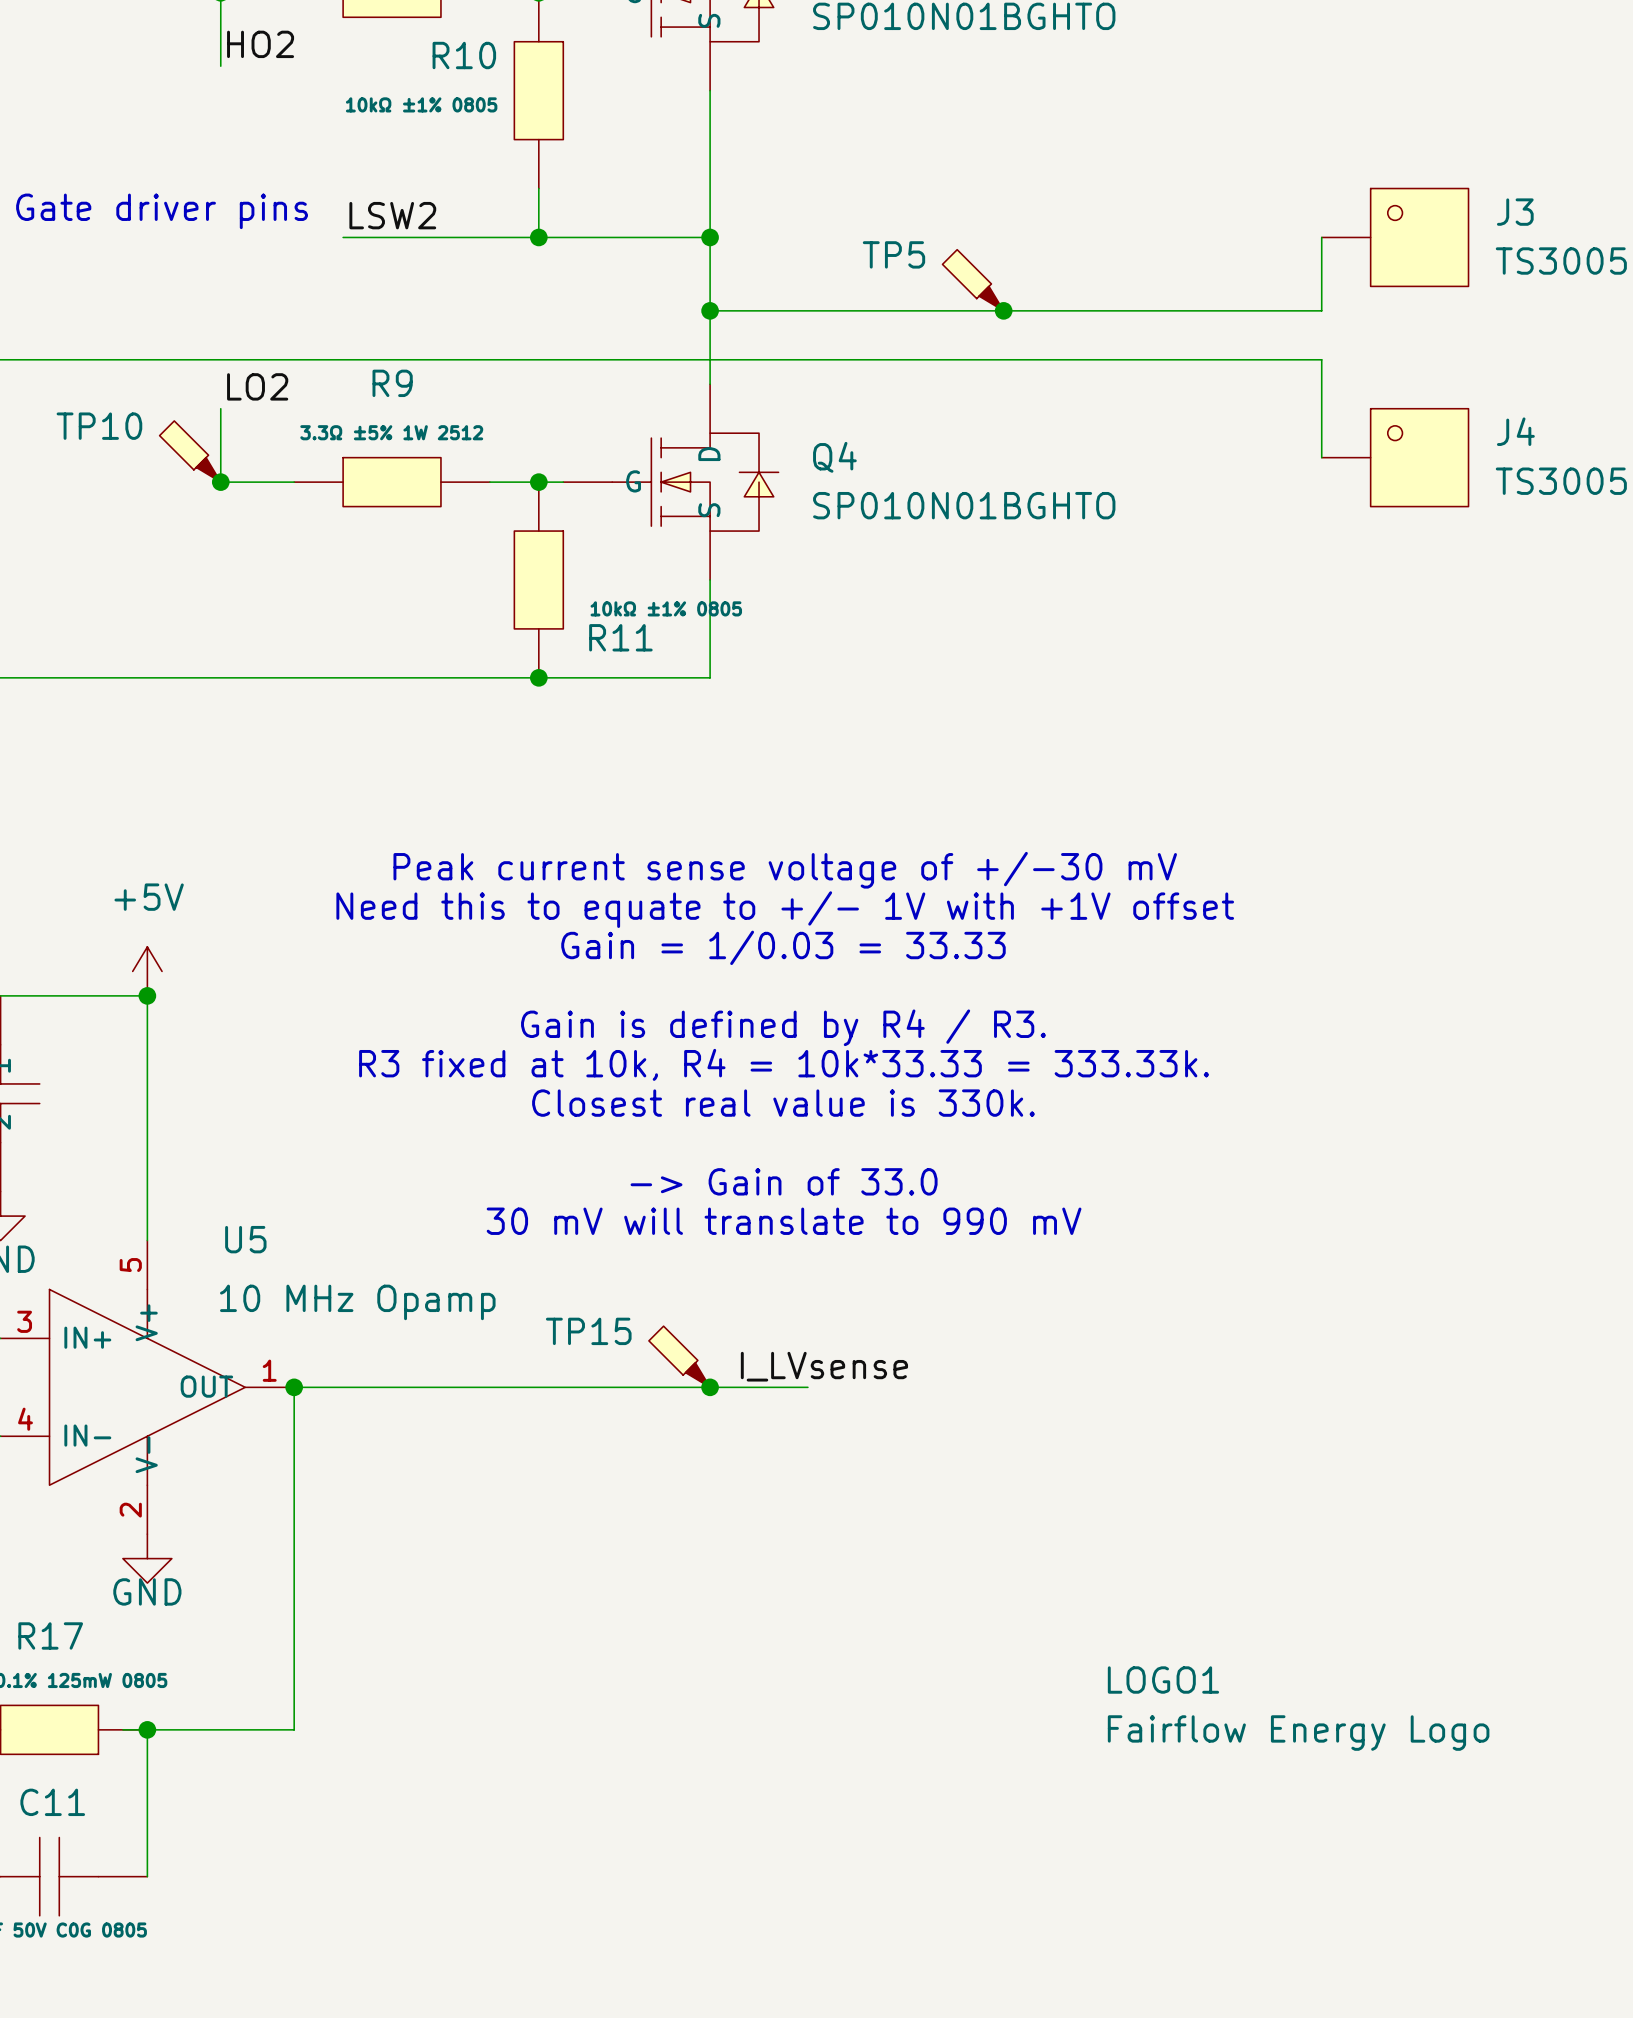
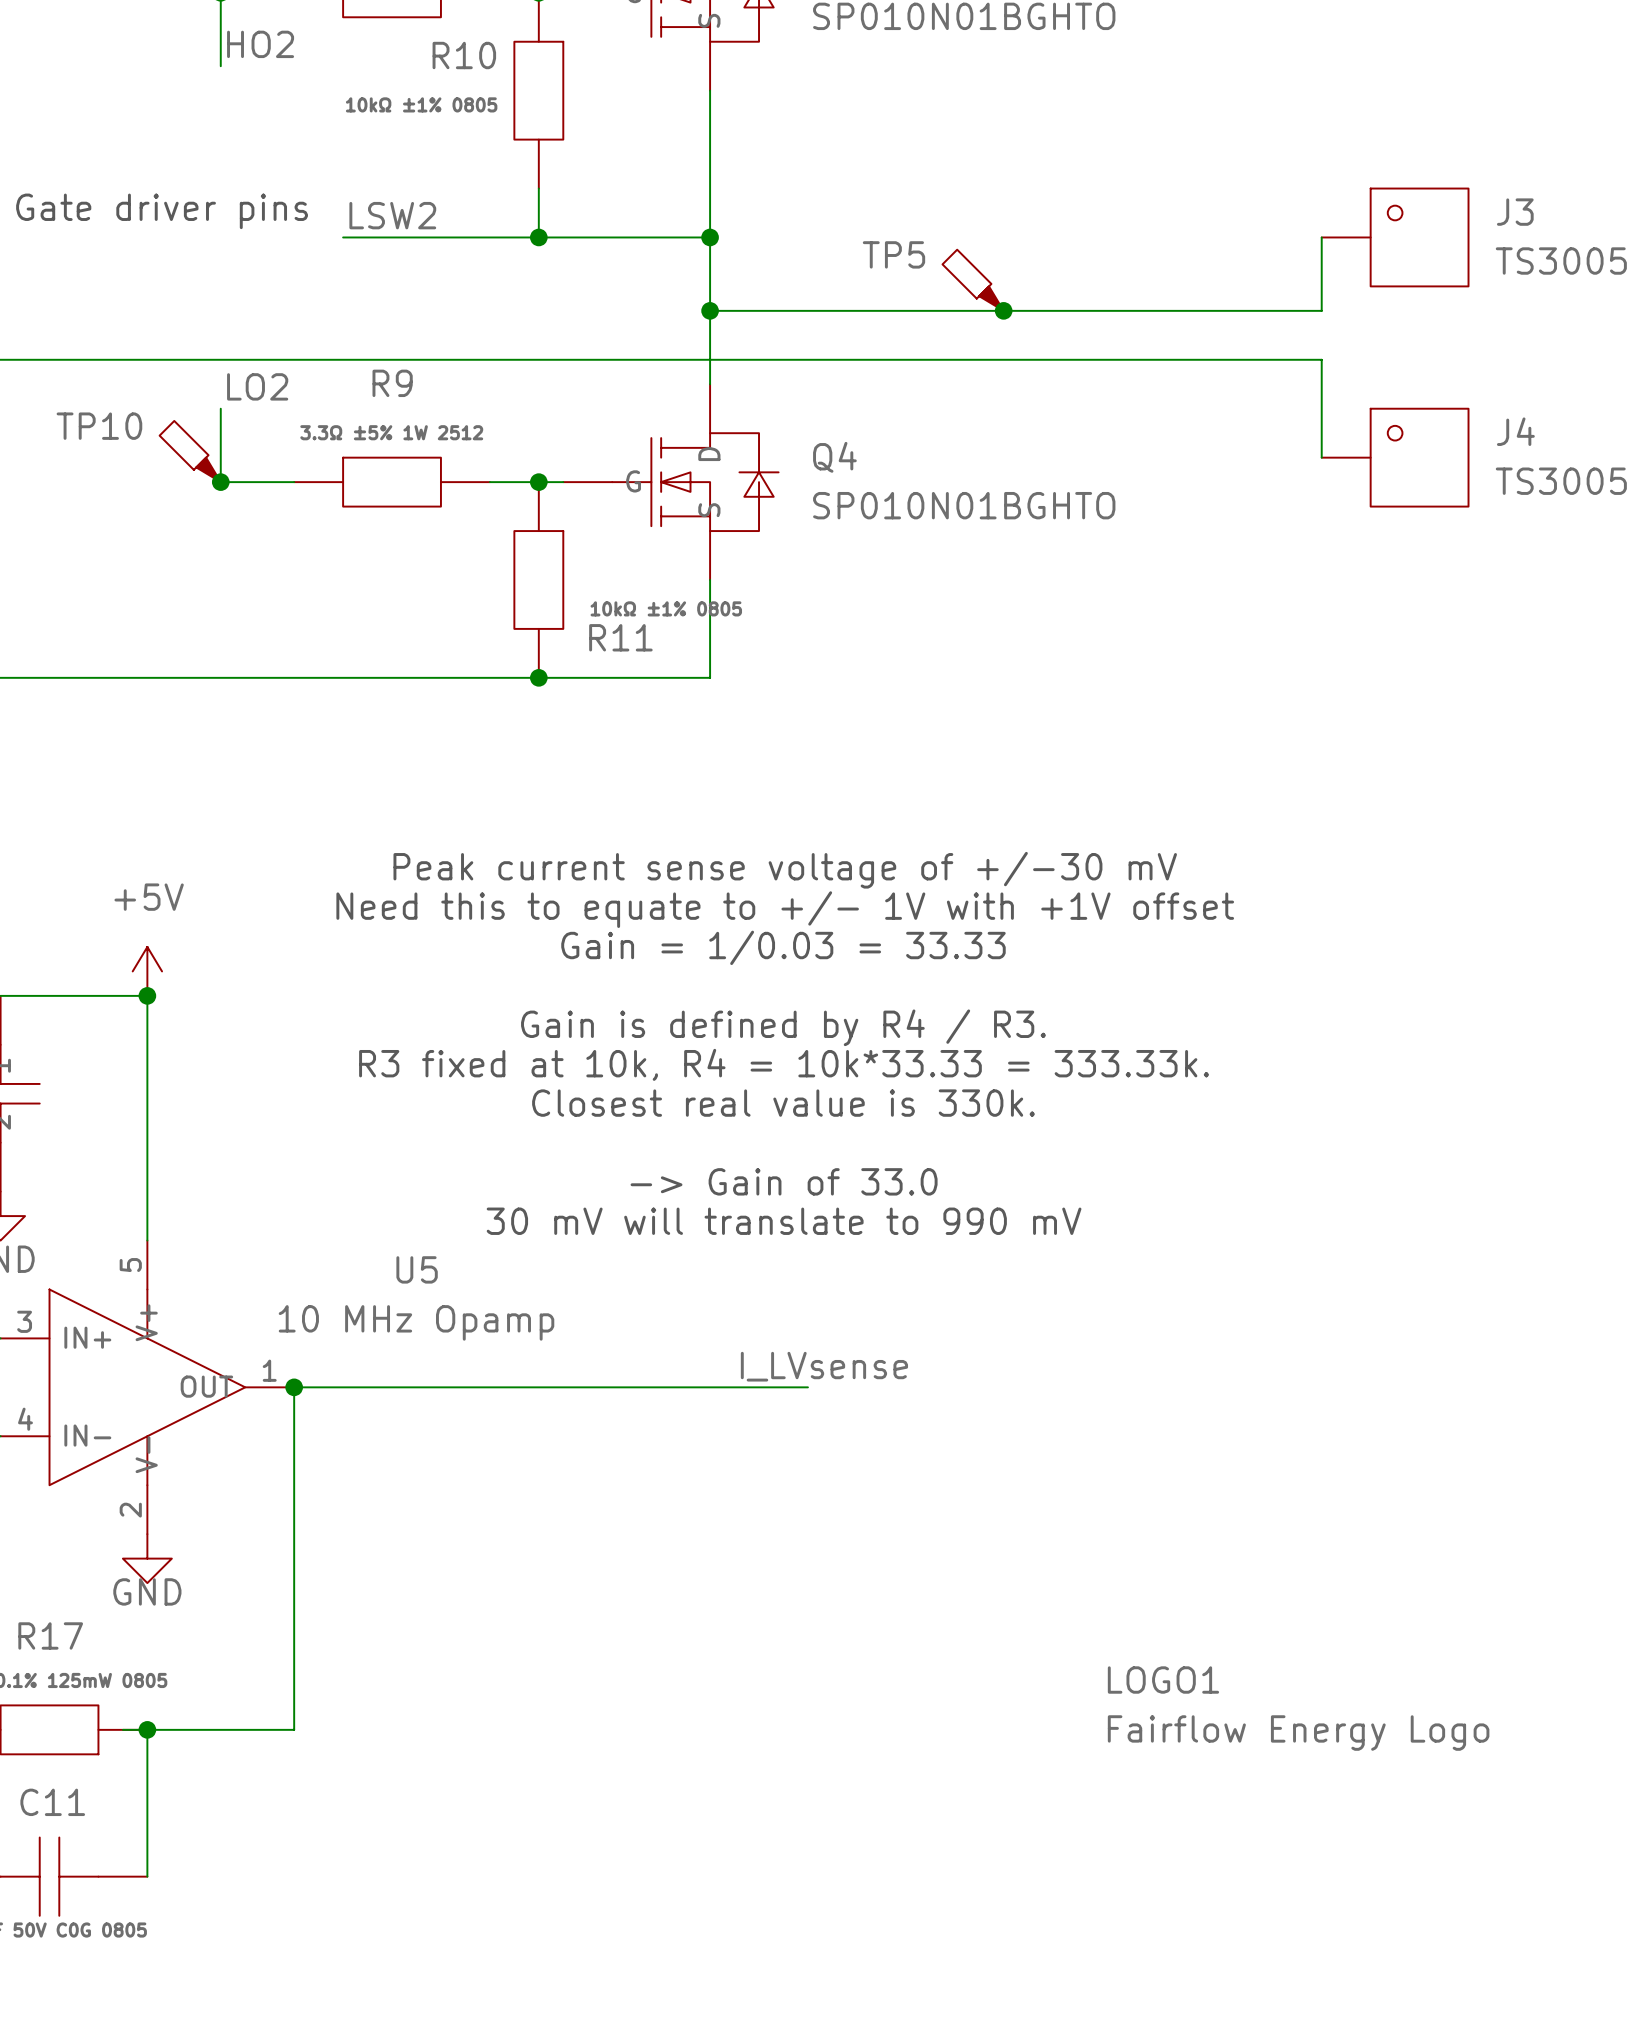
U5 name position: U5 (245, 1239) -> U5 (417, 1269)
U5 value position: 10 MHz Opamp (357, 1302) -> 10 MHz Opamp (416, 1322)
TP15: (679, 1356) -> none
junction: (710, 1387) -> none

